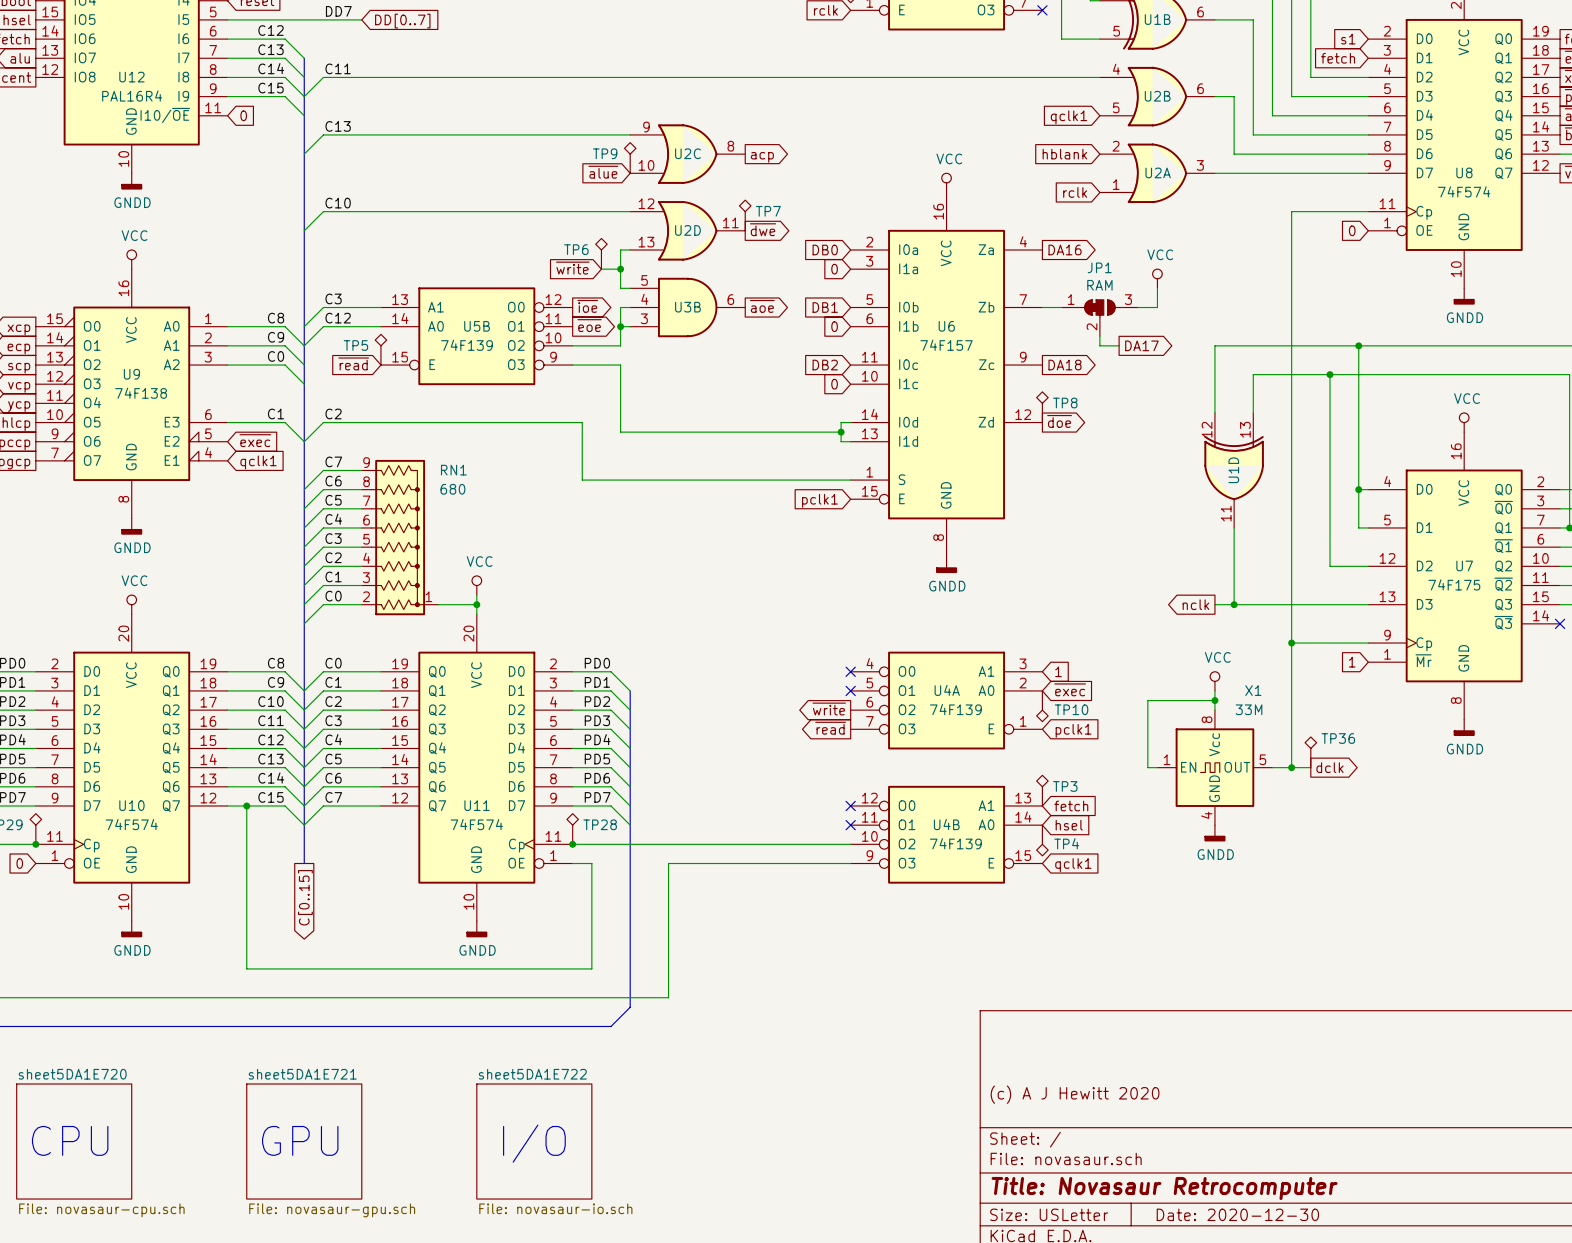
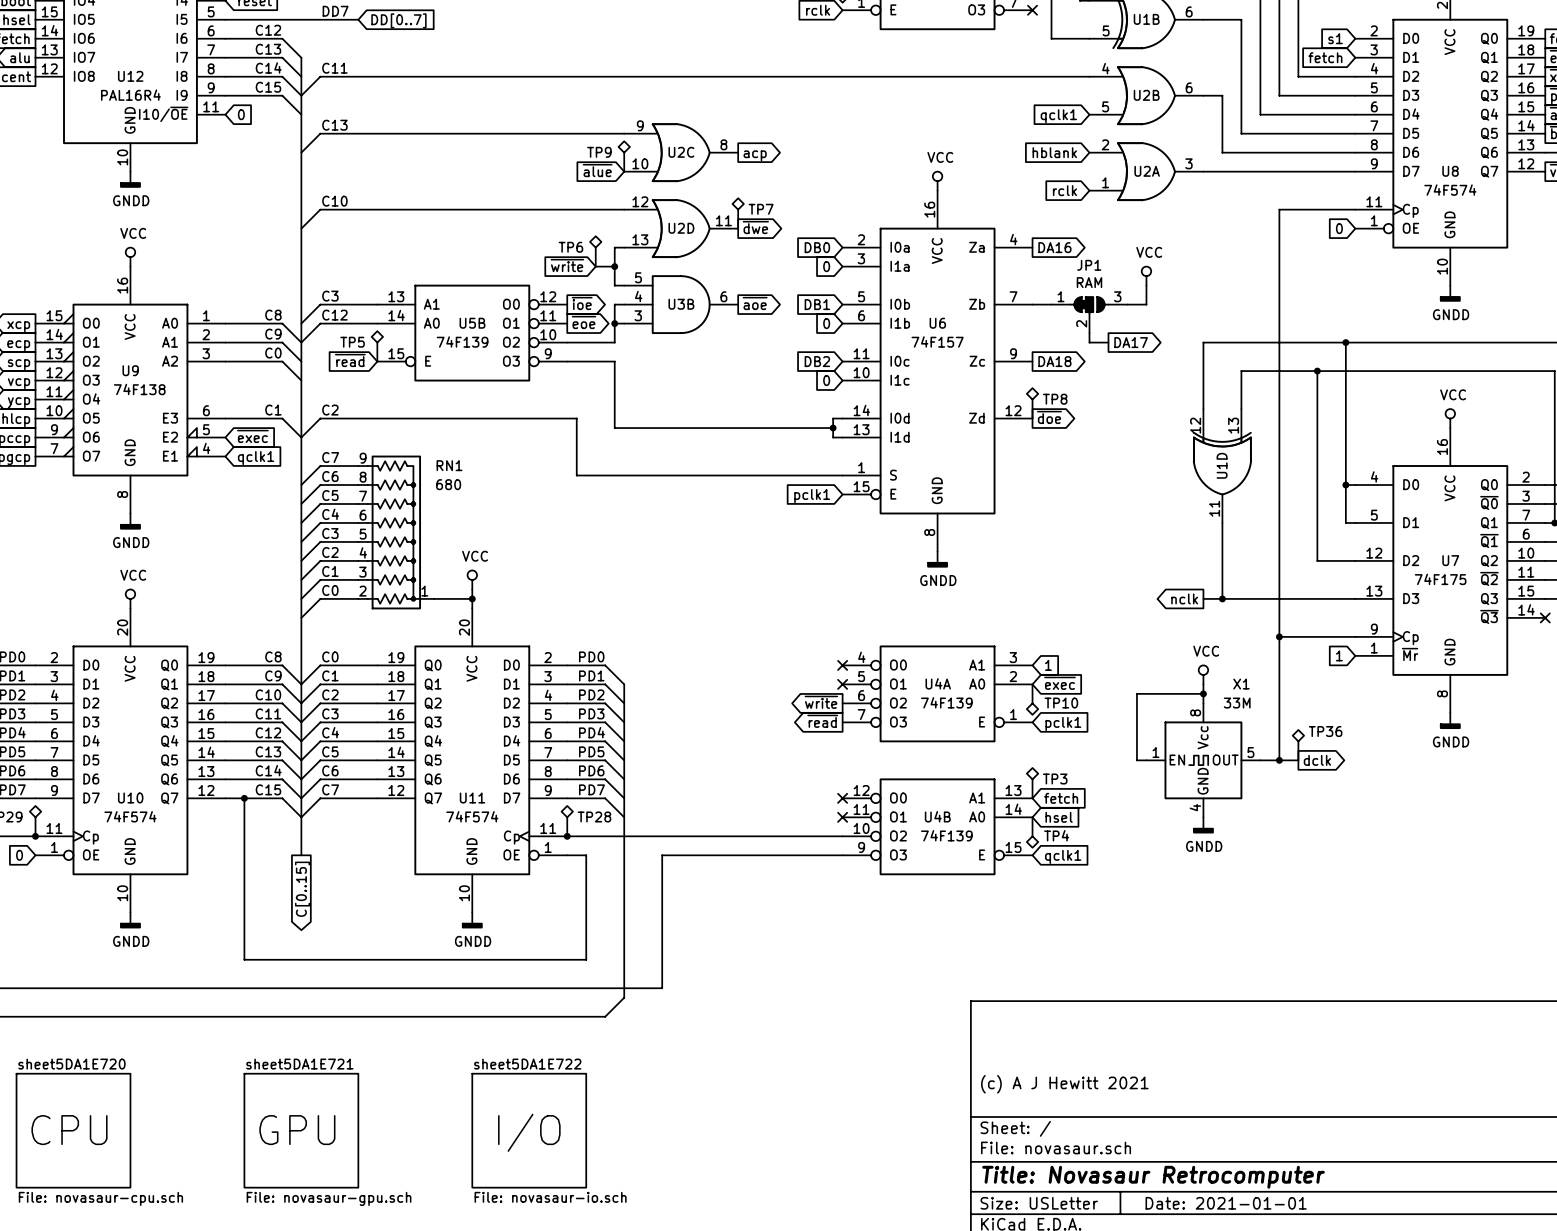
title block: (c) A J Hewitt 2020 (1075, 1094) -> (c) A J Hewitt 2021 (1064, 1084)
title block: Date: 2020-12-30 (1237, 1214) -> Date: 2021-01-01 (1226, 1203)

